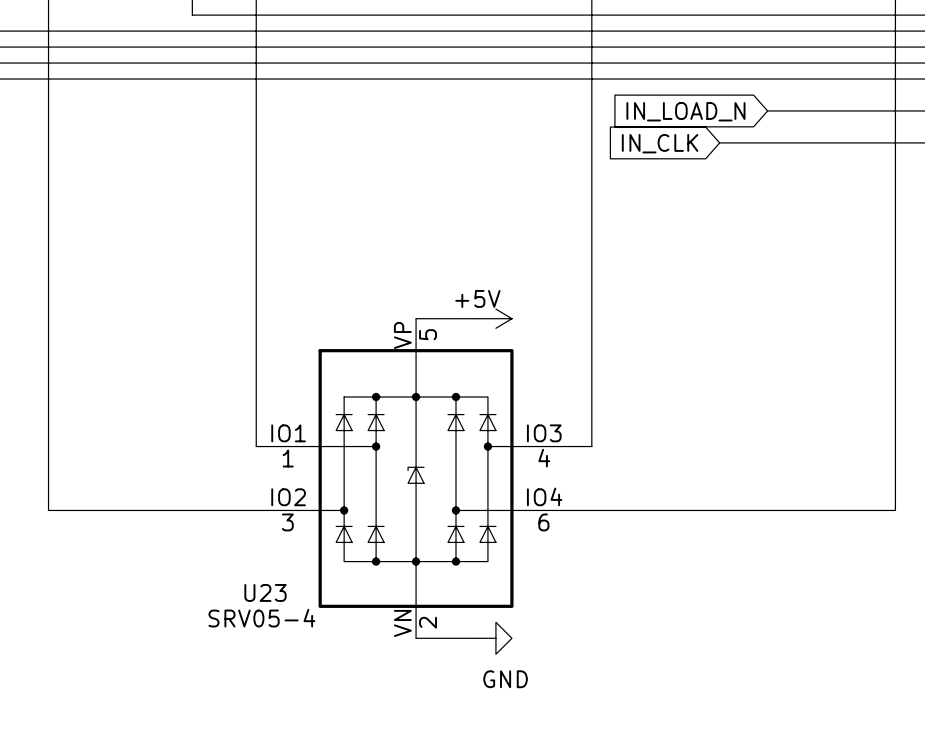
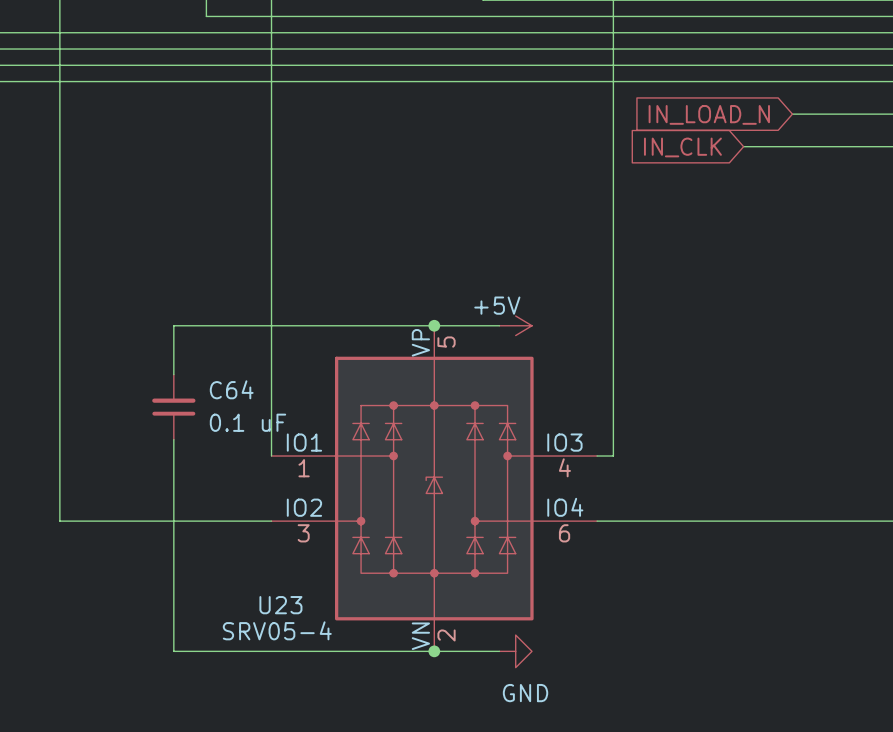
wire: none -> (434, 325) (173, 325) (173, 374)
junction: none -> (434, 325)
C64: none -> 0.1 uF (173, 407)
wire: none -> (173, 439) (173, 651) (434, 651)
junction: none -> (434, 651)

